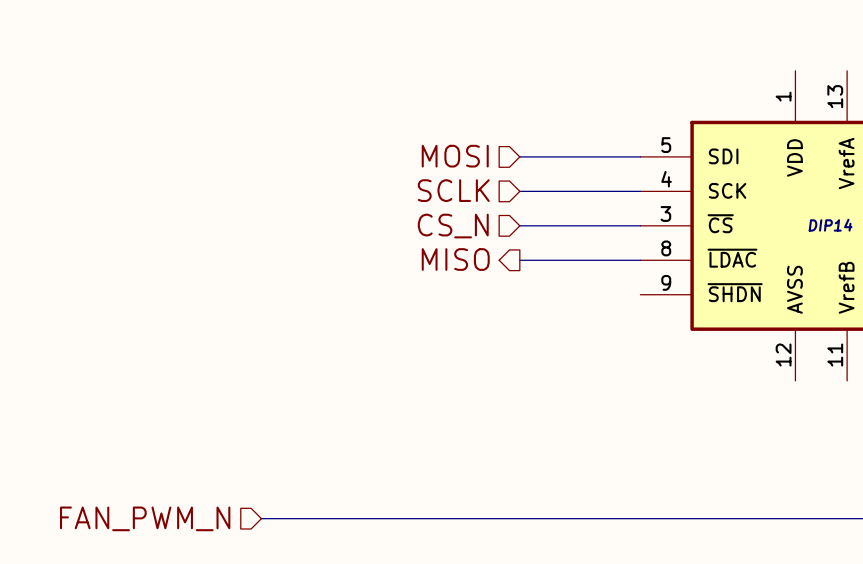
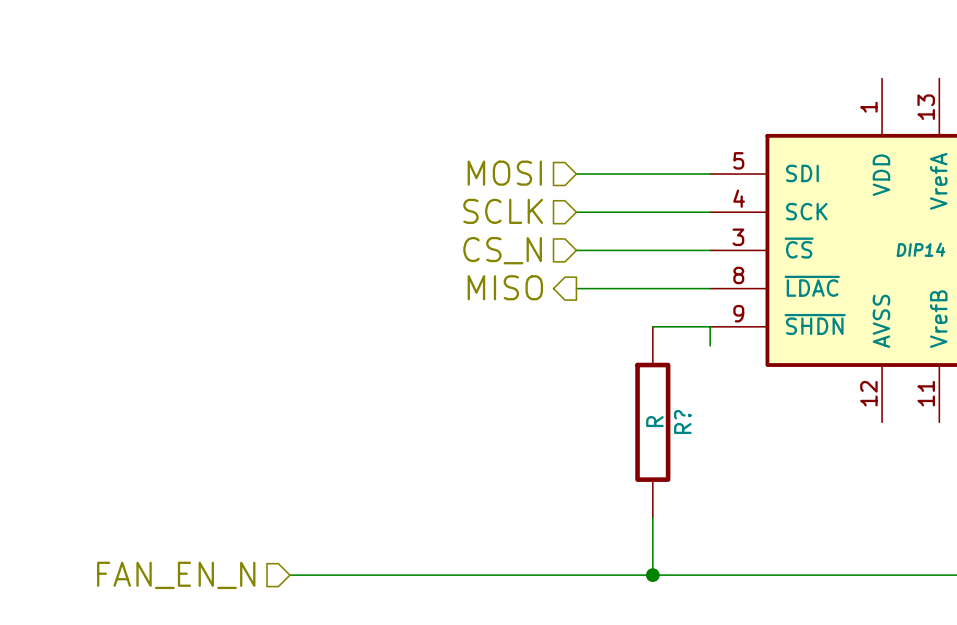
wire: none -> (652, 326) (710, 326) (710, 345)
R?: none -> R (652, 422)
wire: none -> (652, 517) (652, 575)
hierarchical label: FAN_PWM_N (145, 518) -> FAN_EN_N (176, 575)
junction: none -> (652, 575)

